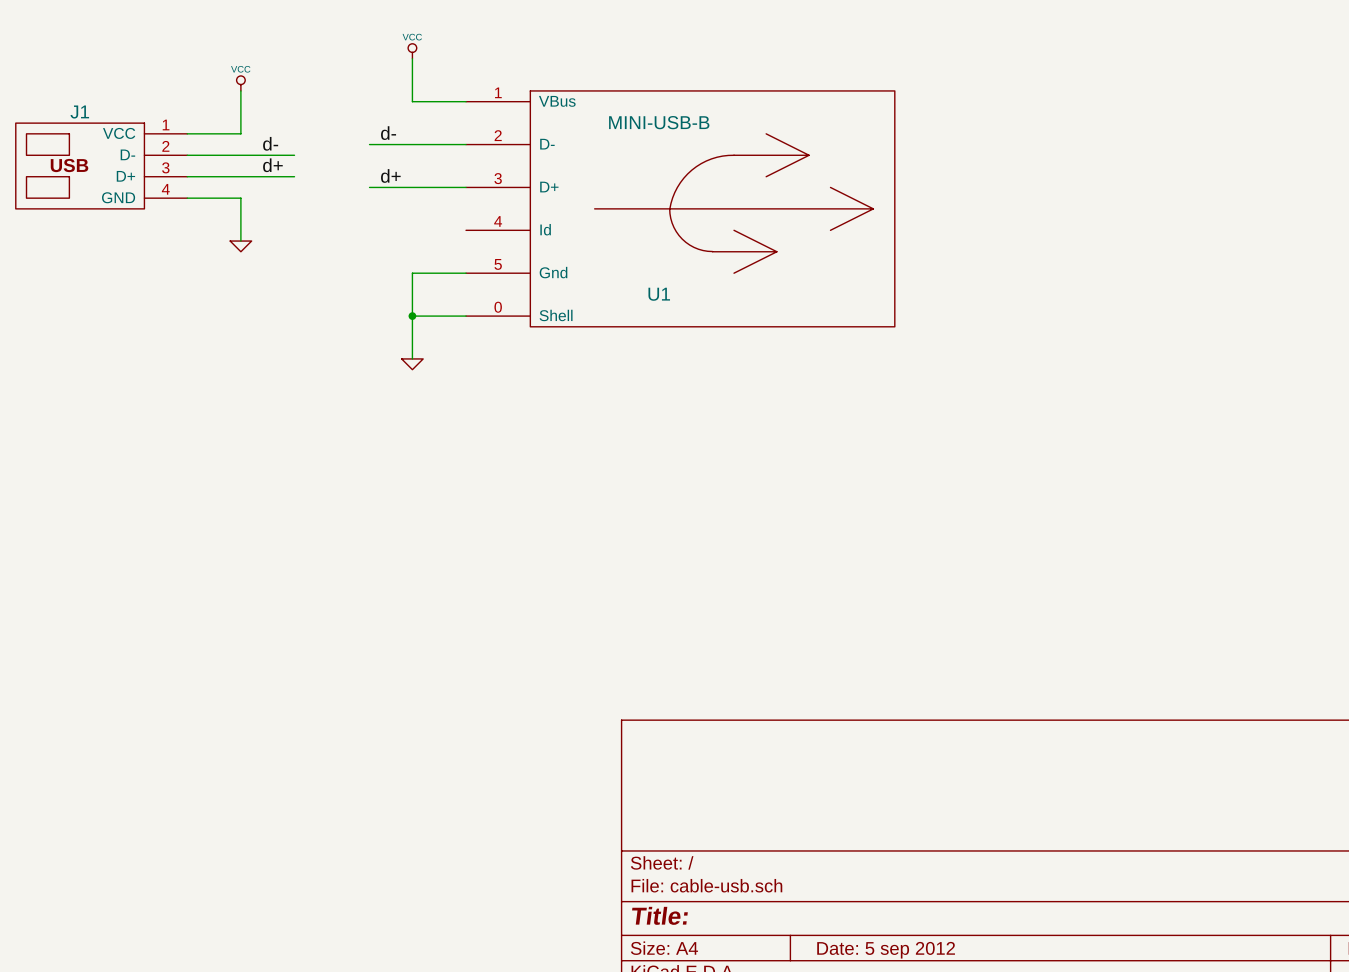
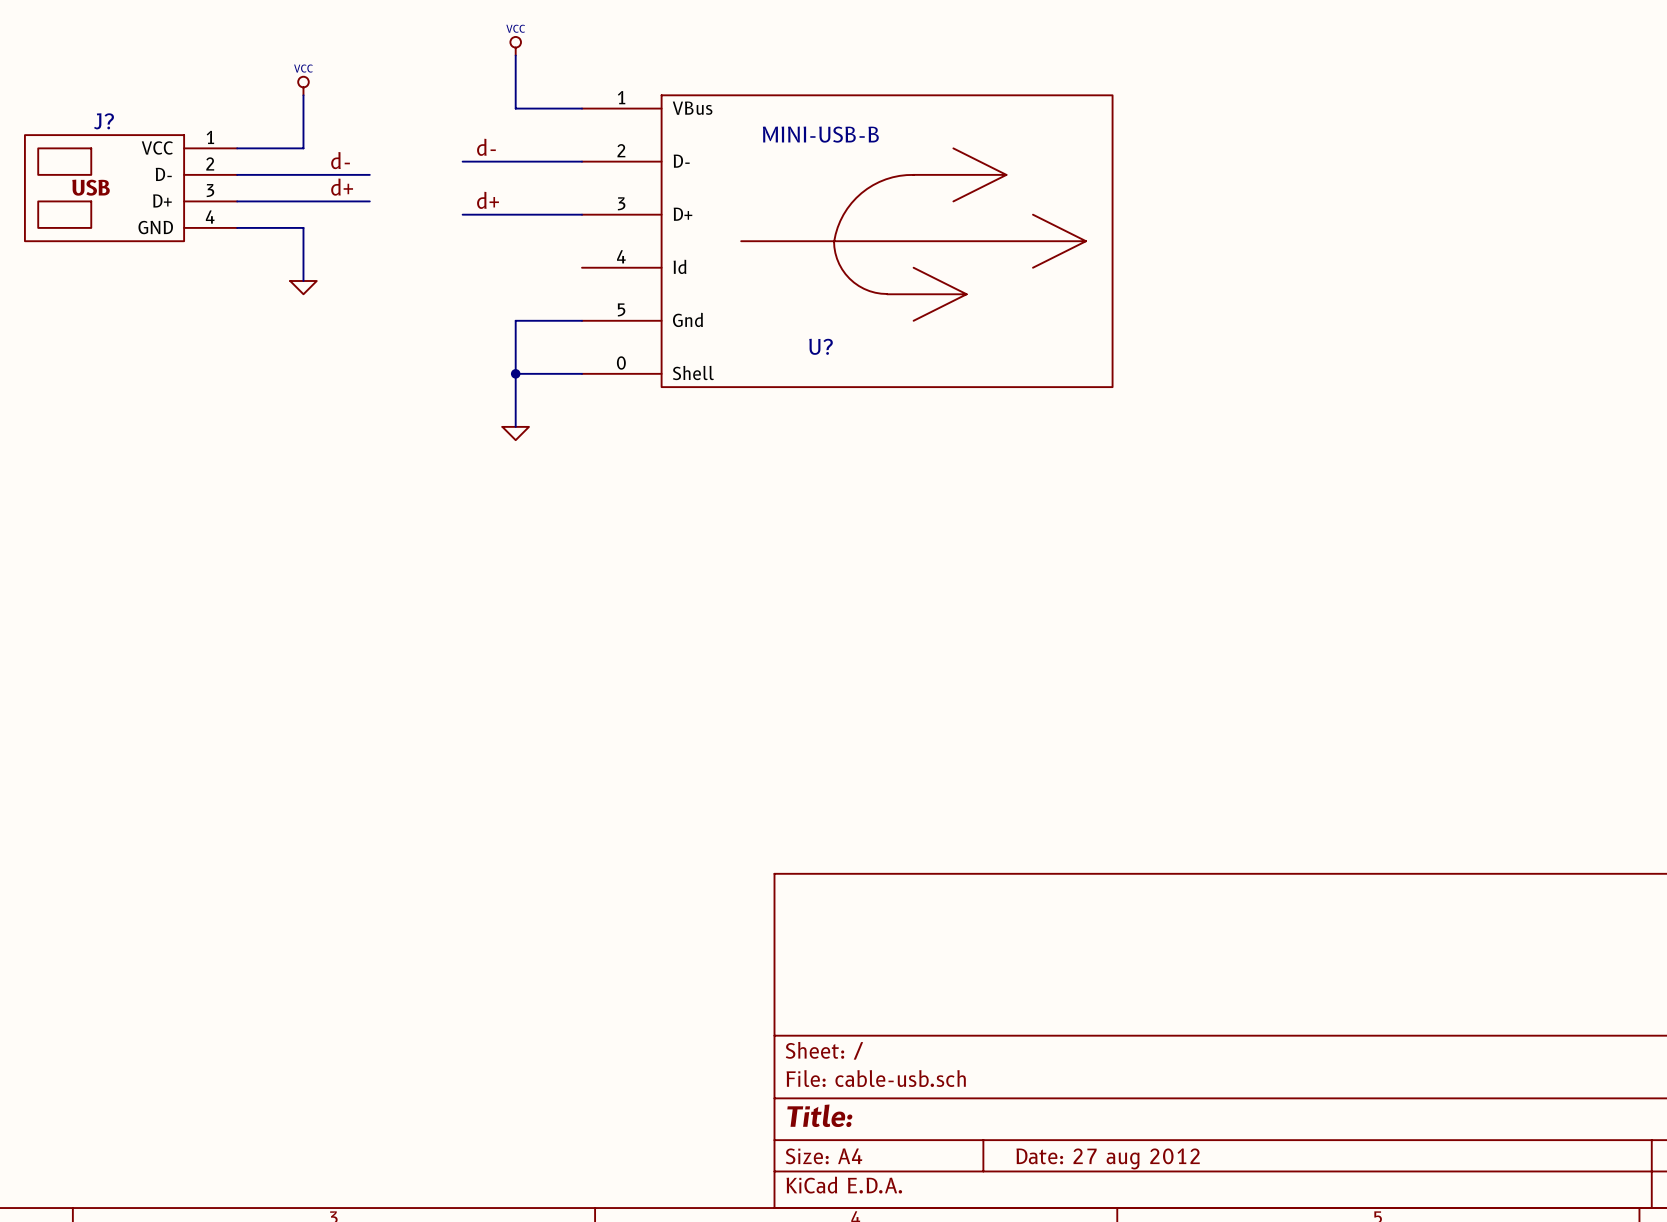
J1 name: J1 (79, 112) -> J? (104, 121)
U1 name: U1 (659, 294) -> U? (821, 346)
title block: Date: 5 sep 2012 (886, 950) -> Date: 27 aug 2012 (1108, 1158)

